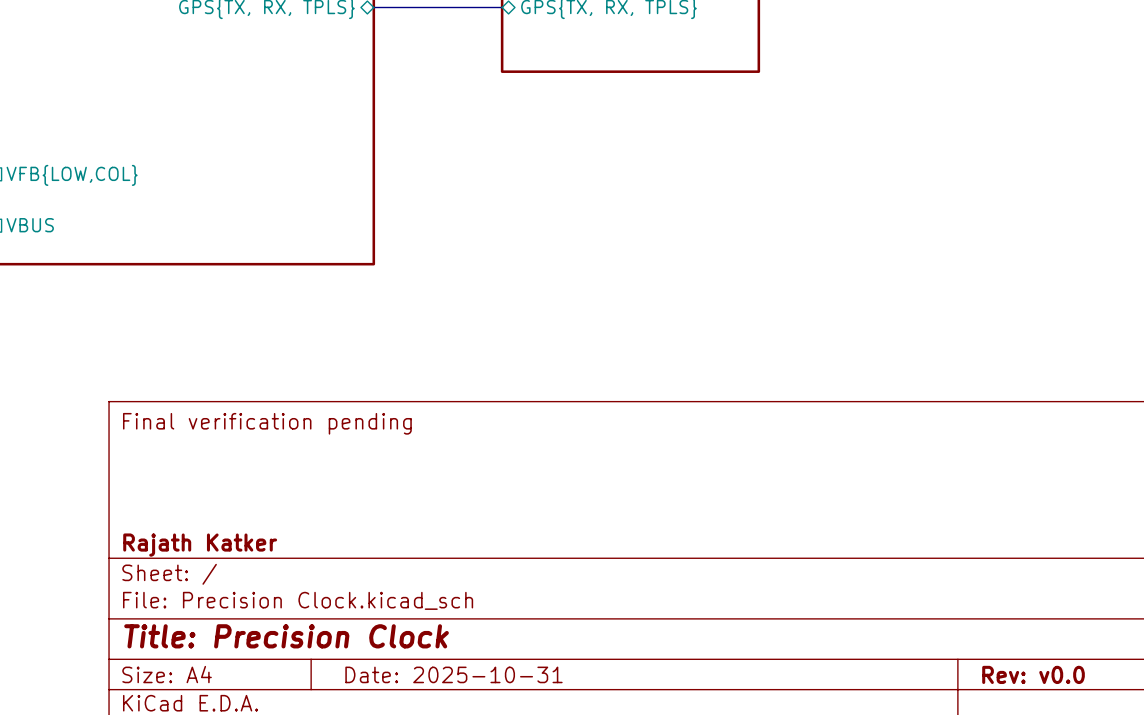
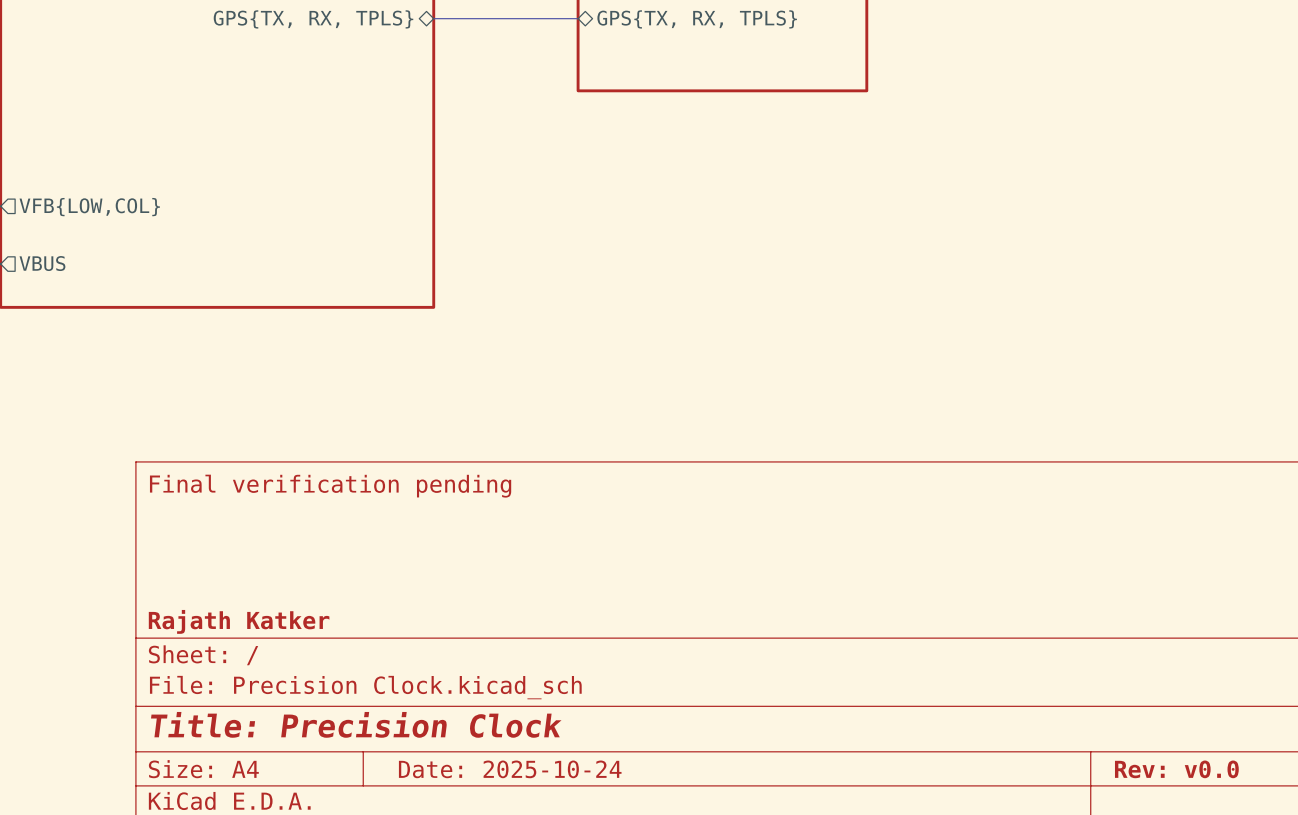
title block: Date: 2025-10-31 (453, 674) -> Date: 2025-10-24 (510, 769)

